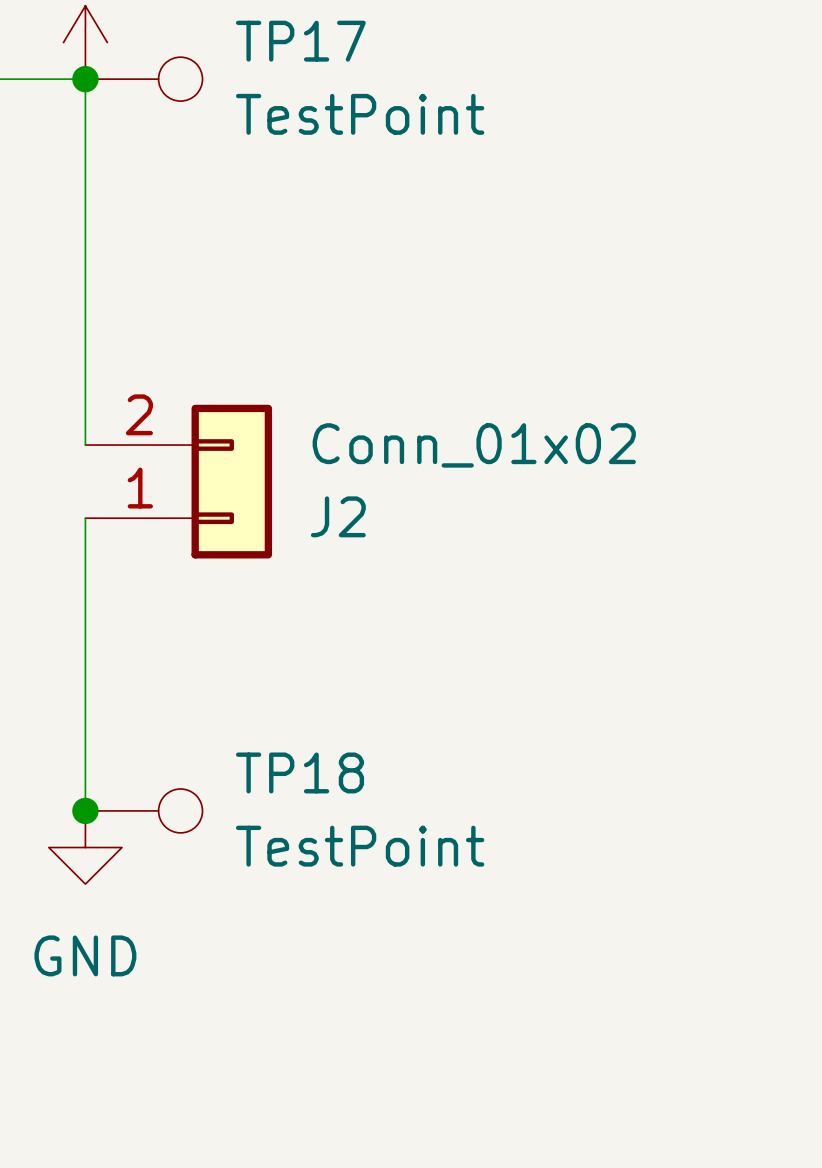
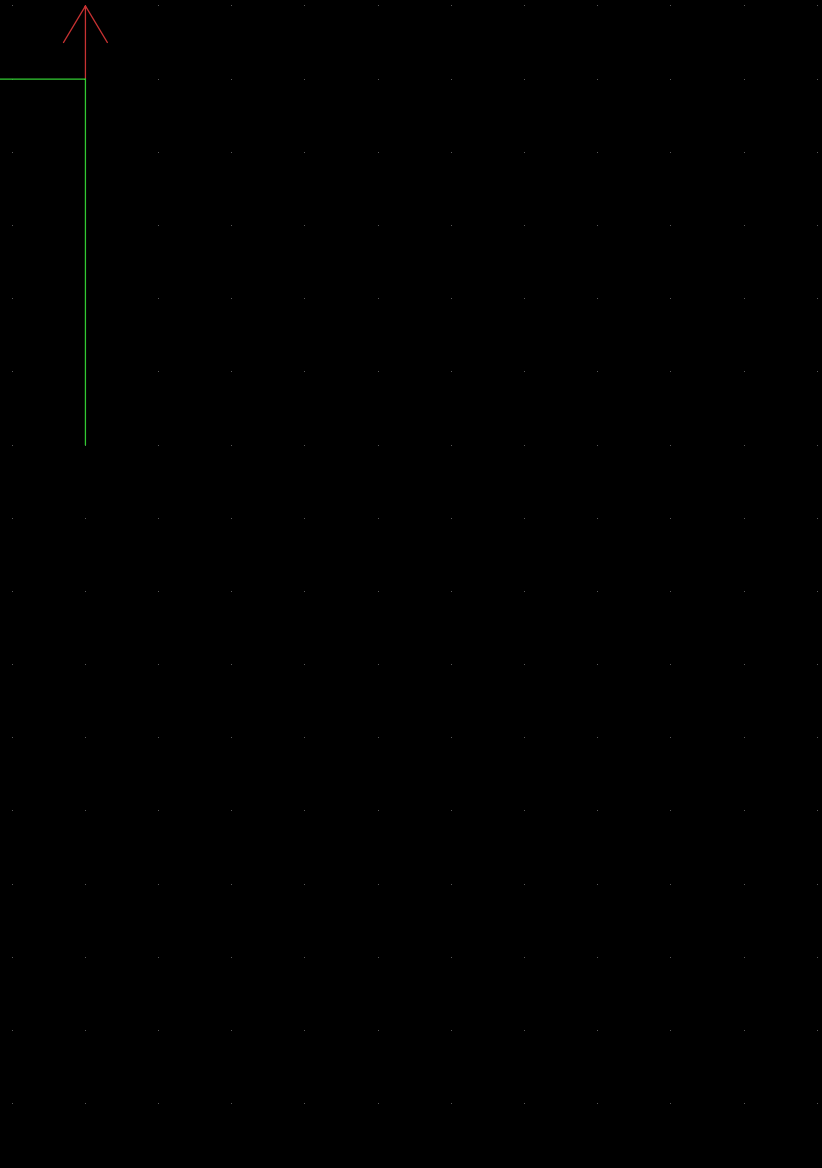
junction: (85, 79) -> none
TP17: TestPoint (143, 79) -> none
J2: Conn_01x02 (178, 481) -> none
wire: (85, 518) (85, 810) -> none
junction: (85, 810) -> none
TP18: TestPoint (143, 810) -> none
power symbol: GND (85, 847) -> none

